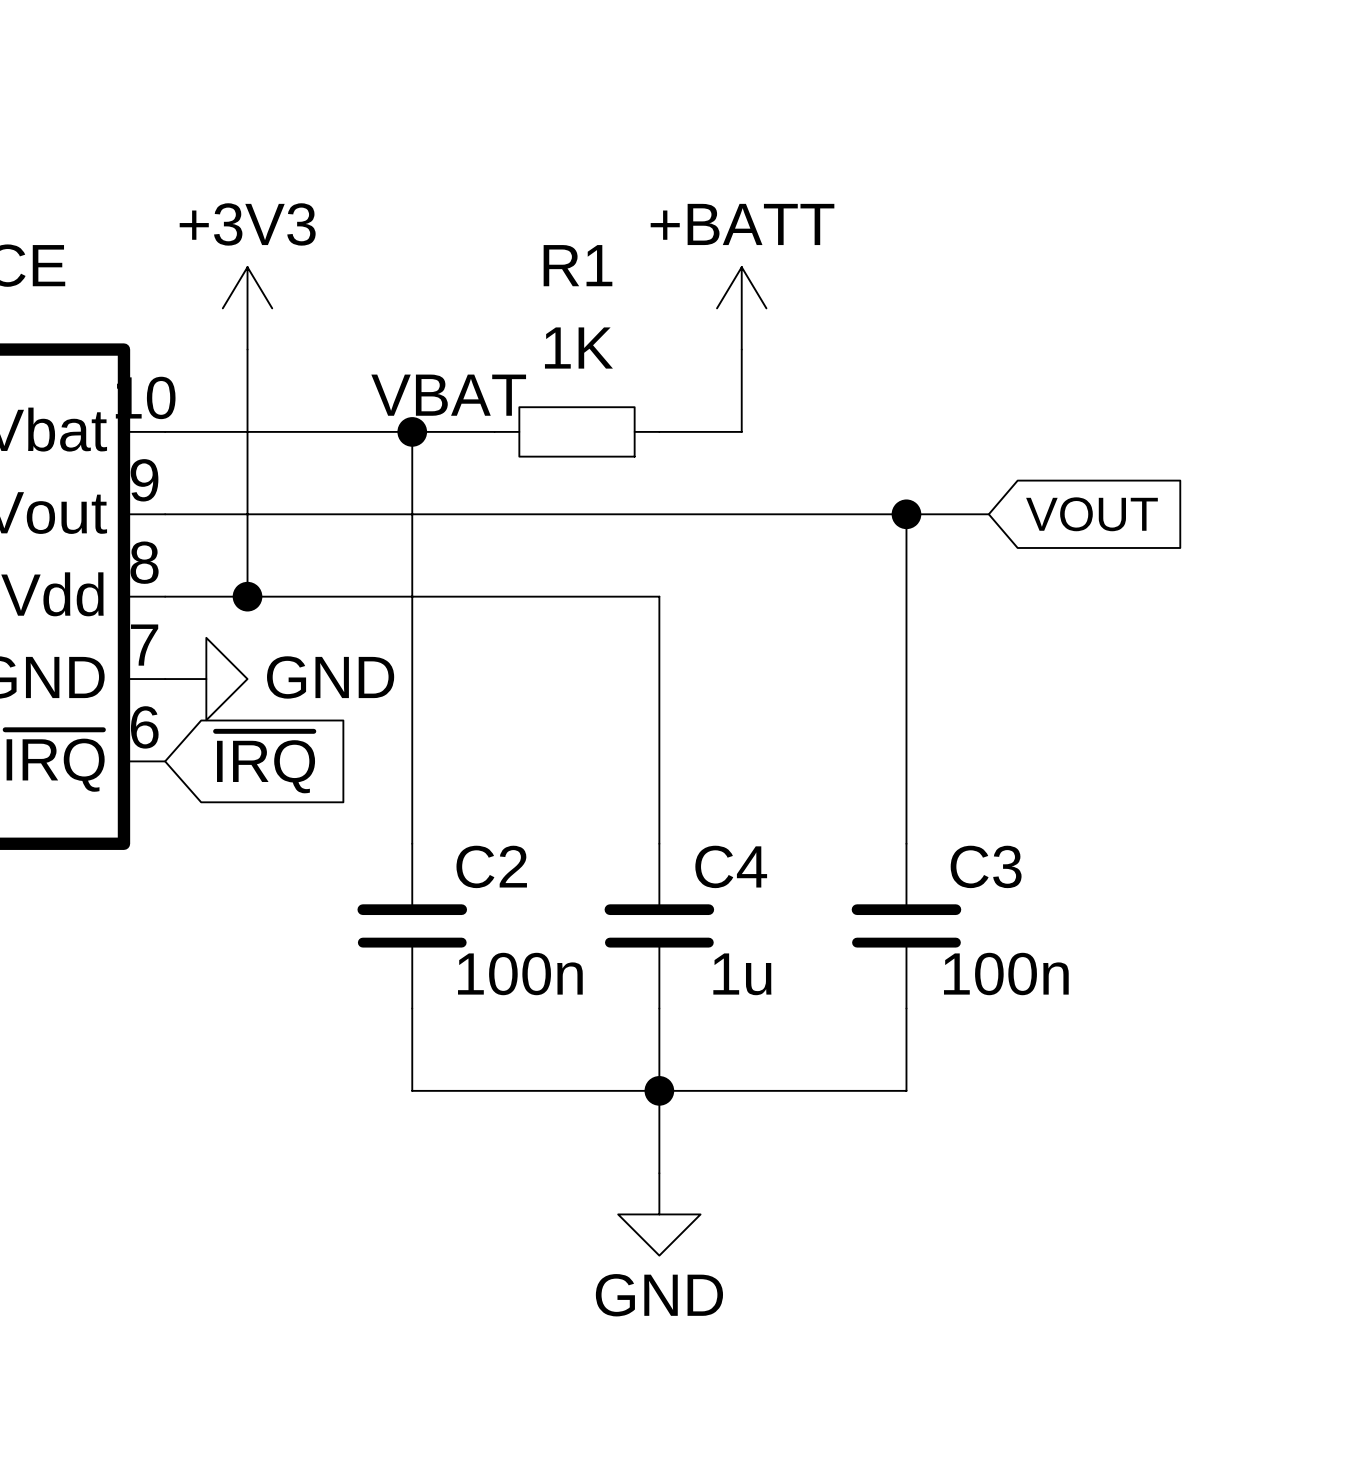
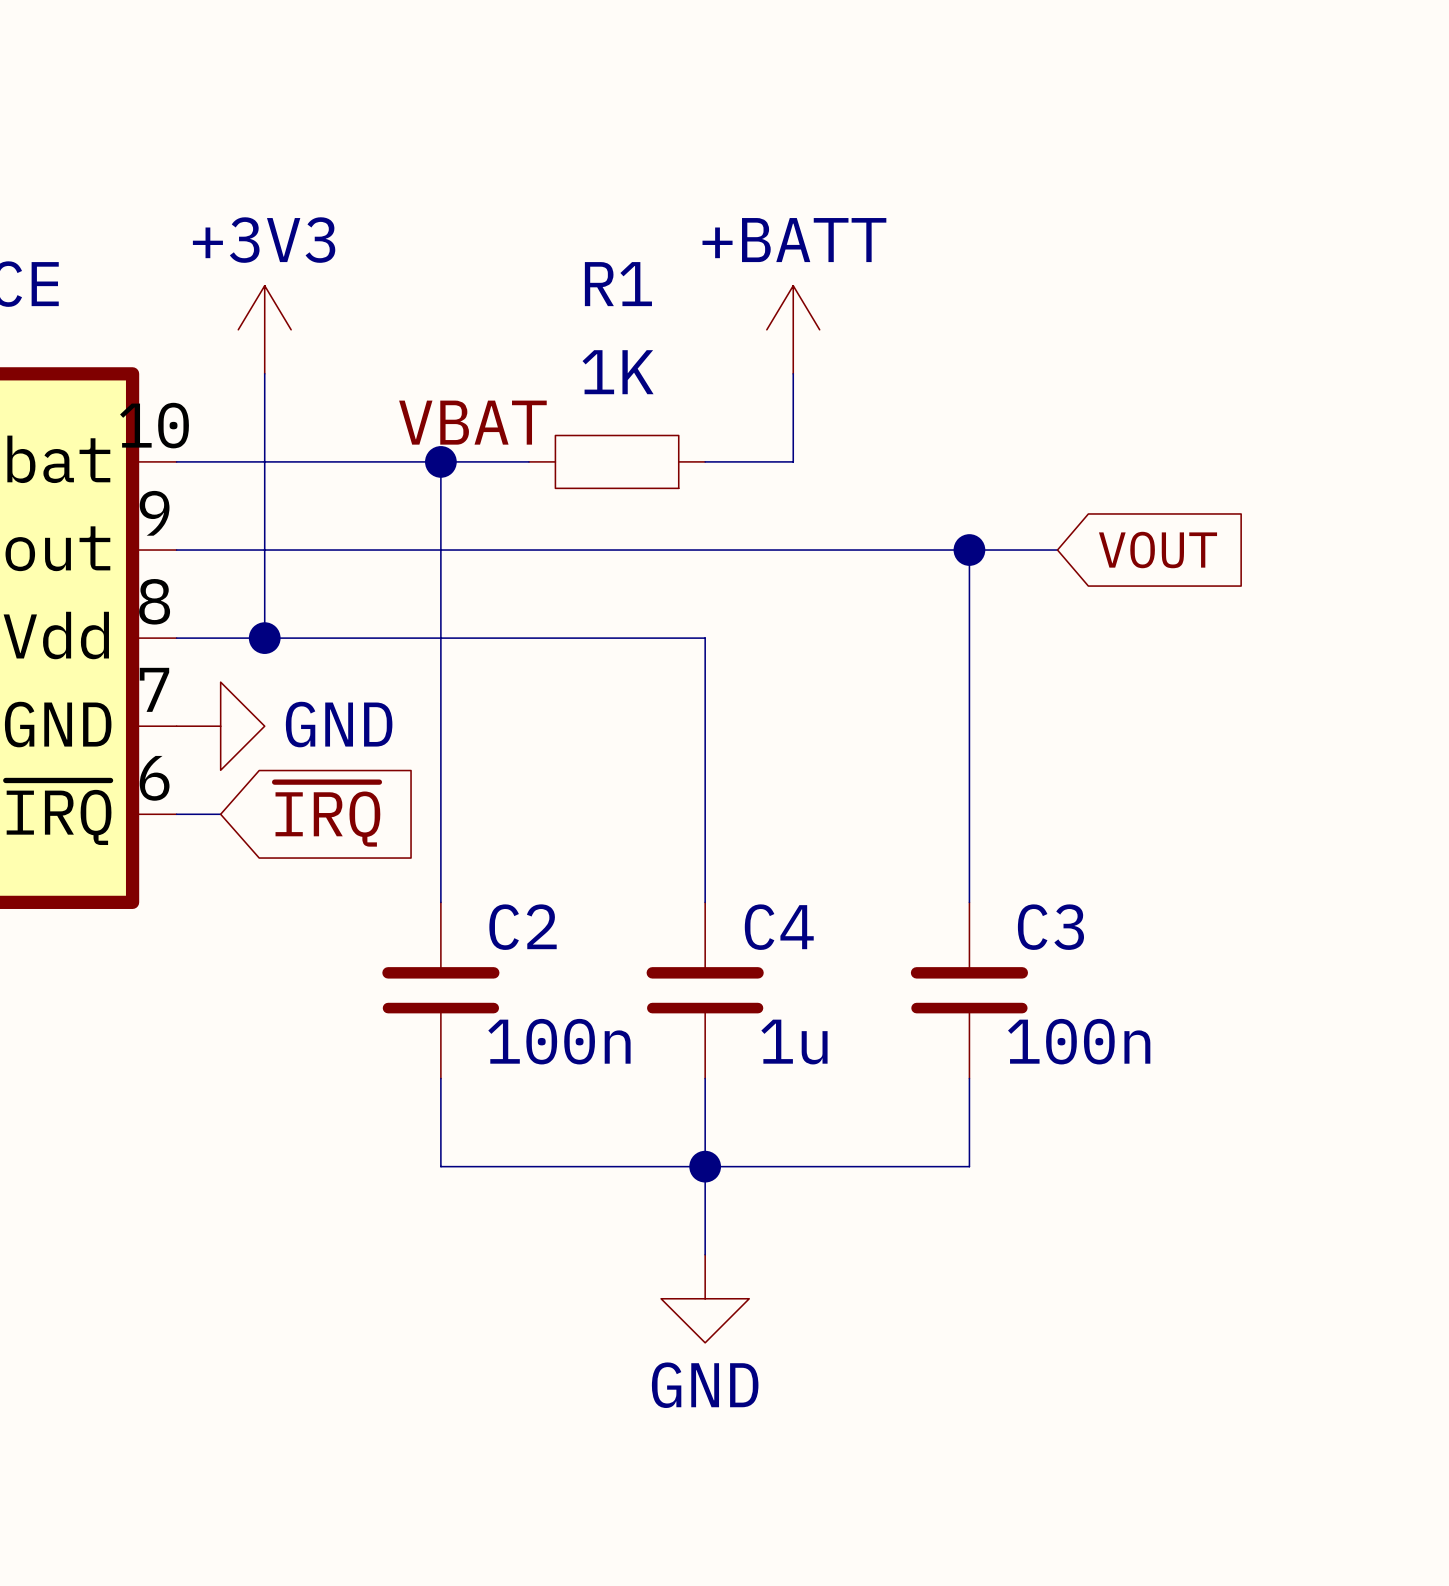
wire: none -> (176, 814) (220, 814)
global label position: ~{IRQ} (265, 762) -> ~{IRQ} (327, 814)

